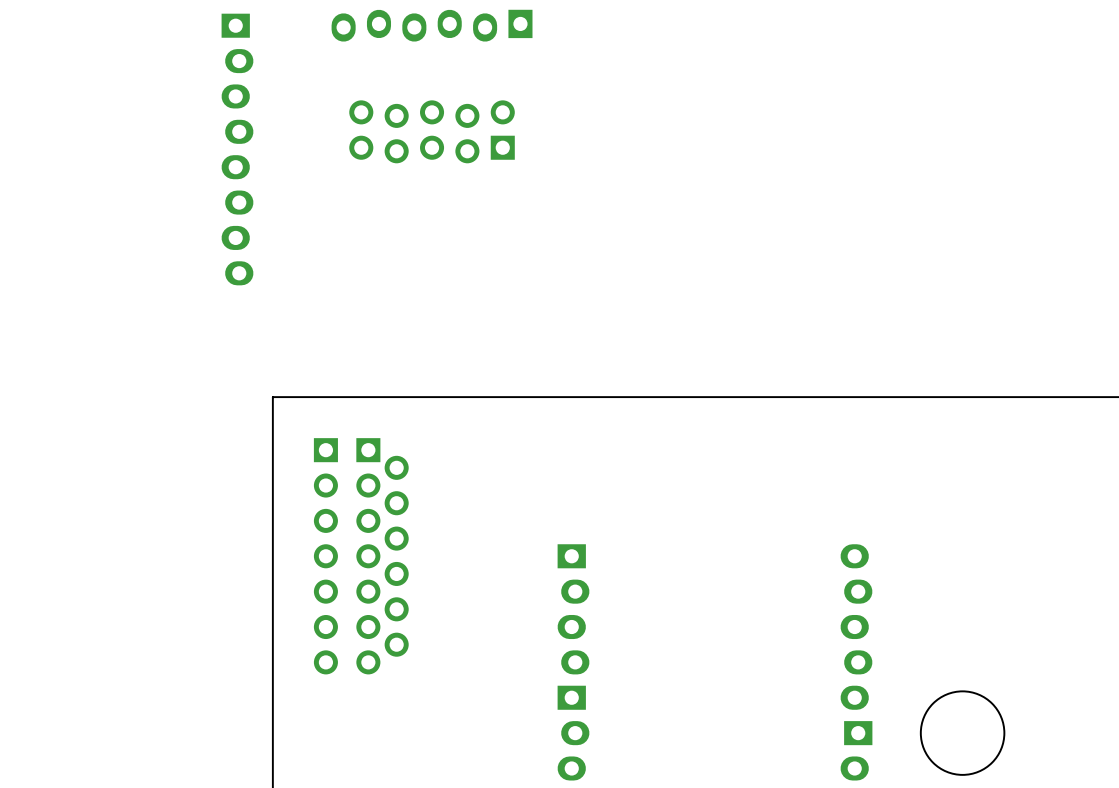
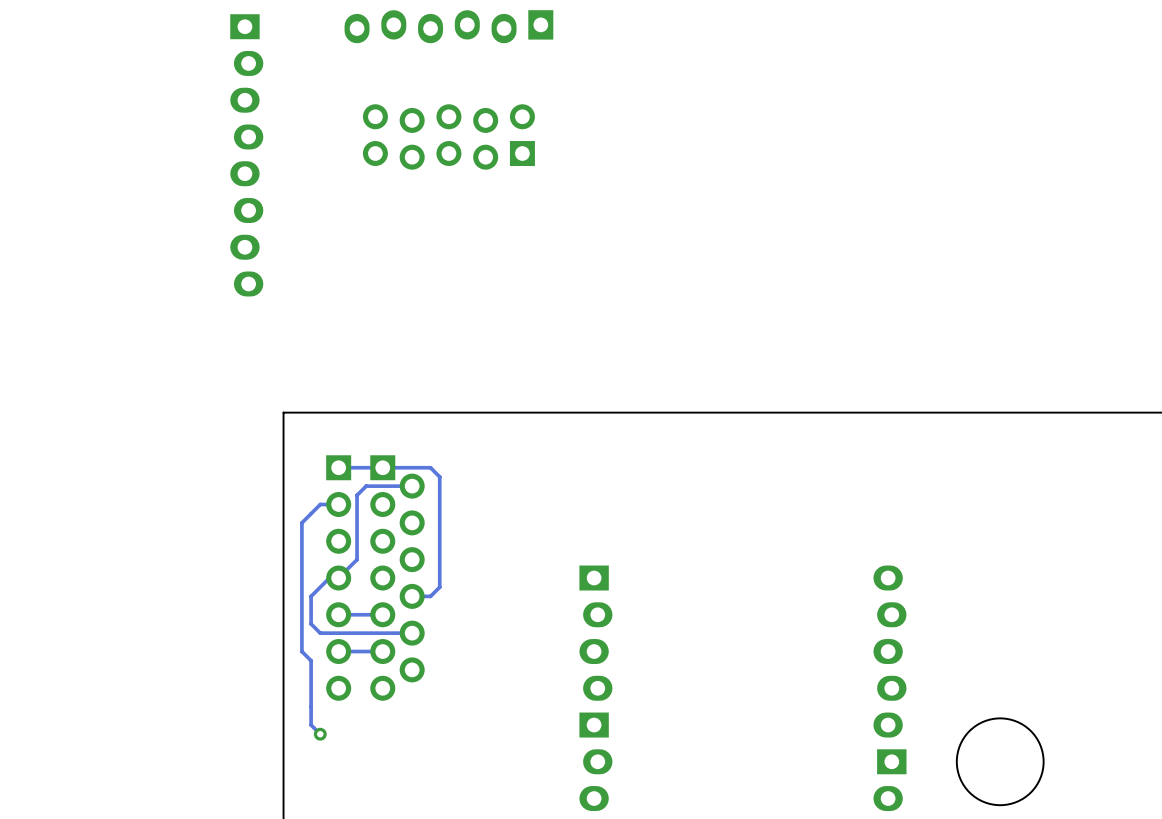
track: none -> (338, 467) (430, 467) (439, 476) (439, 587) (430, 596) (412, 596)
track: none -> (412, 486) (366, 486) (357, 495) (357, 559) (338, 578) (329, 578) (311, 596) (311, 623) (320, 633) (412, 633)
track: none -> (338, 504) (320, 504) (301, 522) (301, 651) (311, 660) (311, 725) (320, 734)
track: none -> (382, 614) (338, 614)
track: none -> (382, 651) (338, 651)
via: none -> (320, 734)

